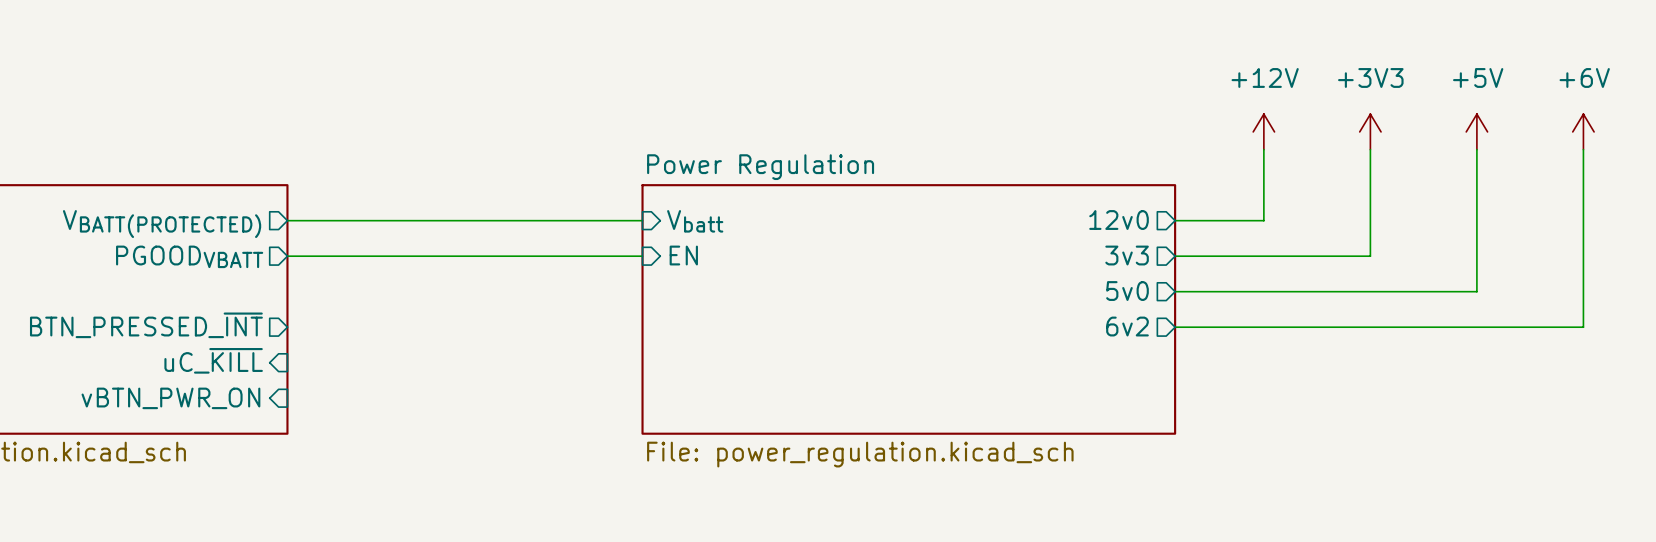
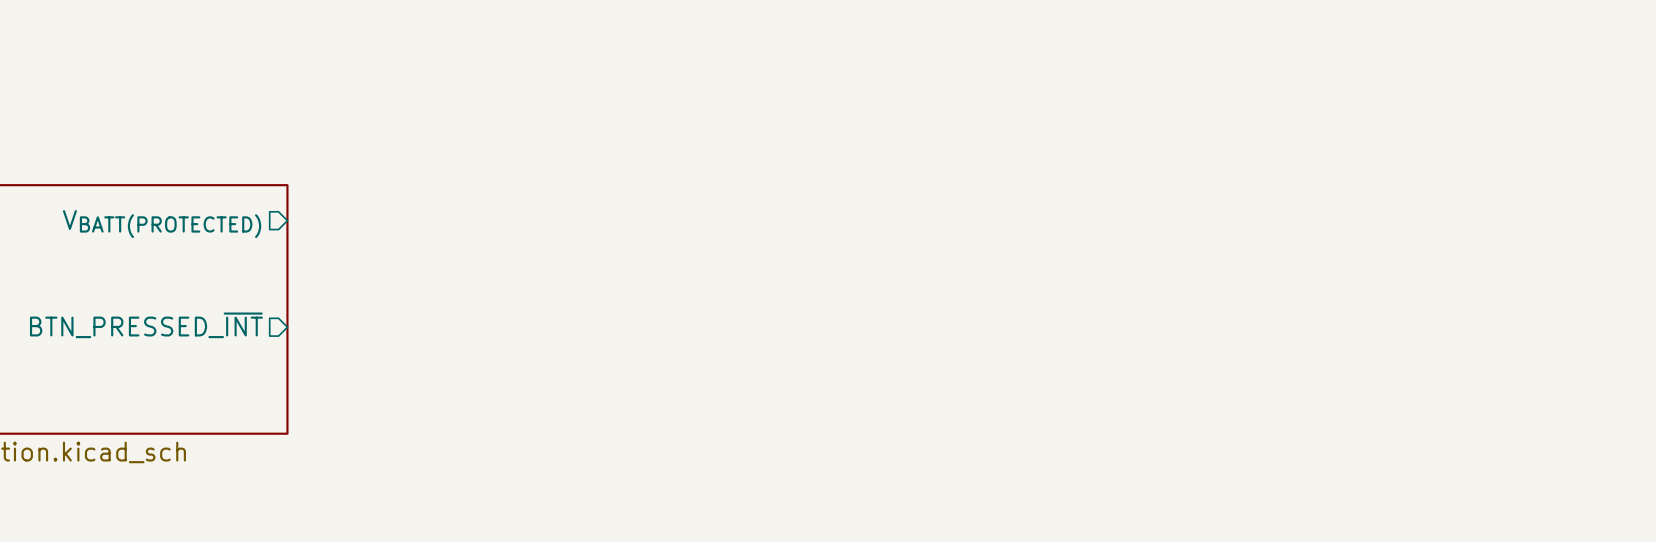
power symbol: +12V (1263, 131) -> none
power symbol: +3V3 (1370, 131) -> none
power symbol: +5V (1476, 131) -> none
power symbol: +6V (1583, 131) -> none
wire: (1263, 149) (1263, 220) (1175, 220) -> none
wire: (1370, 149) (1370, 256) (1175, 256) -> none
wire: (1476, 149) (1476, 291) (1175, 291) -> none
wire: (1583, 149) (1583, 327) (1175, 327) -> none
wire: (287, 220) (642, 220) -> none
sheet pin: 12v0 (1119, 220) -> none
sheet pin: Vbatt (695, 221) -> none
sheet pin: EN (683, 255) -> none
sheet pin: 3v3 (1127, 255) -> none
sheet pin: PGOODVBATT (189, 256) -> none
wire: (287, 256) (642, 256) -> none
sheet pin: 5v0 (1127, 291) -> none
sheet Power Regulation: File: power_regulation.kicad_sch (908, 309) -> none
sheet pin: 6v2 (1127, 326) -> none
sheet pin: uC_~{KILL} (213, 360) -> none
sheet pin: vBTN_PWR_ON (170, 398) -> none

